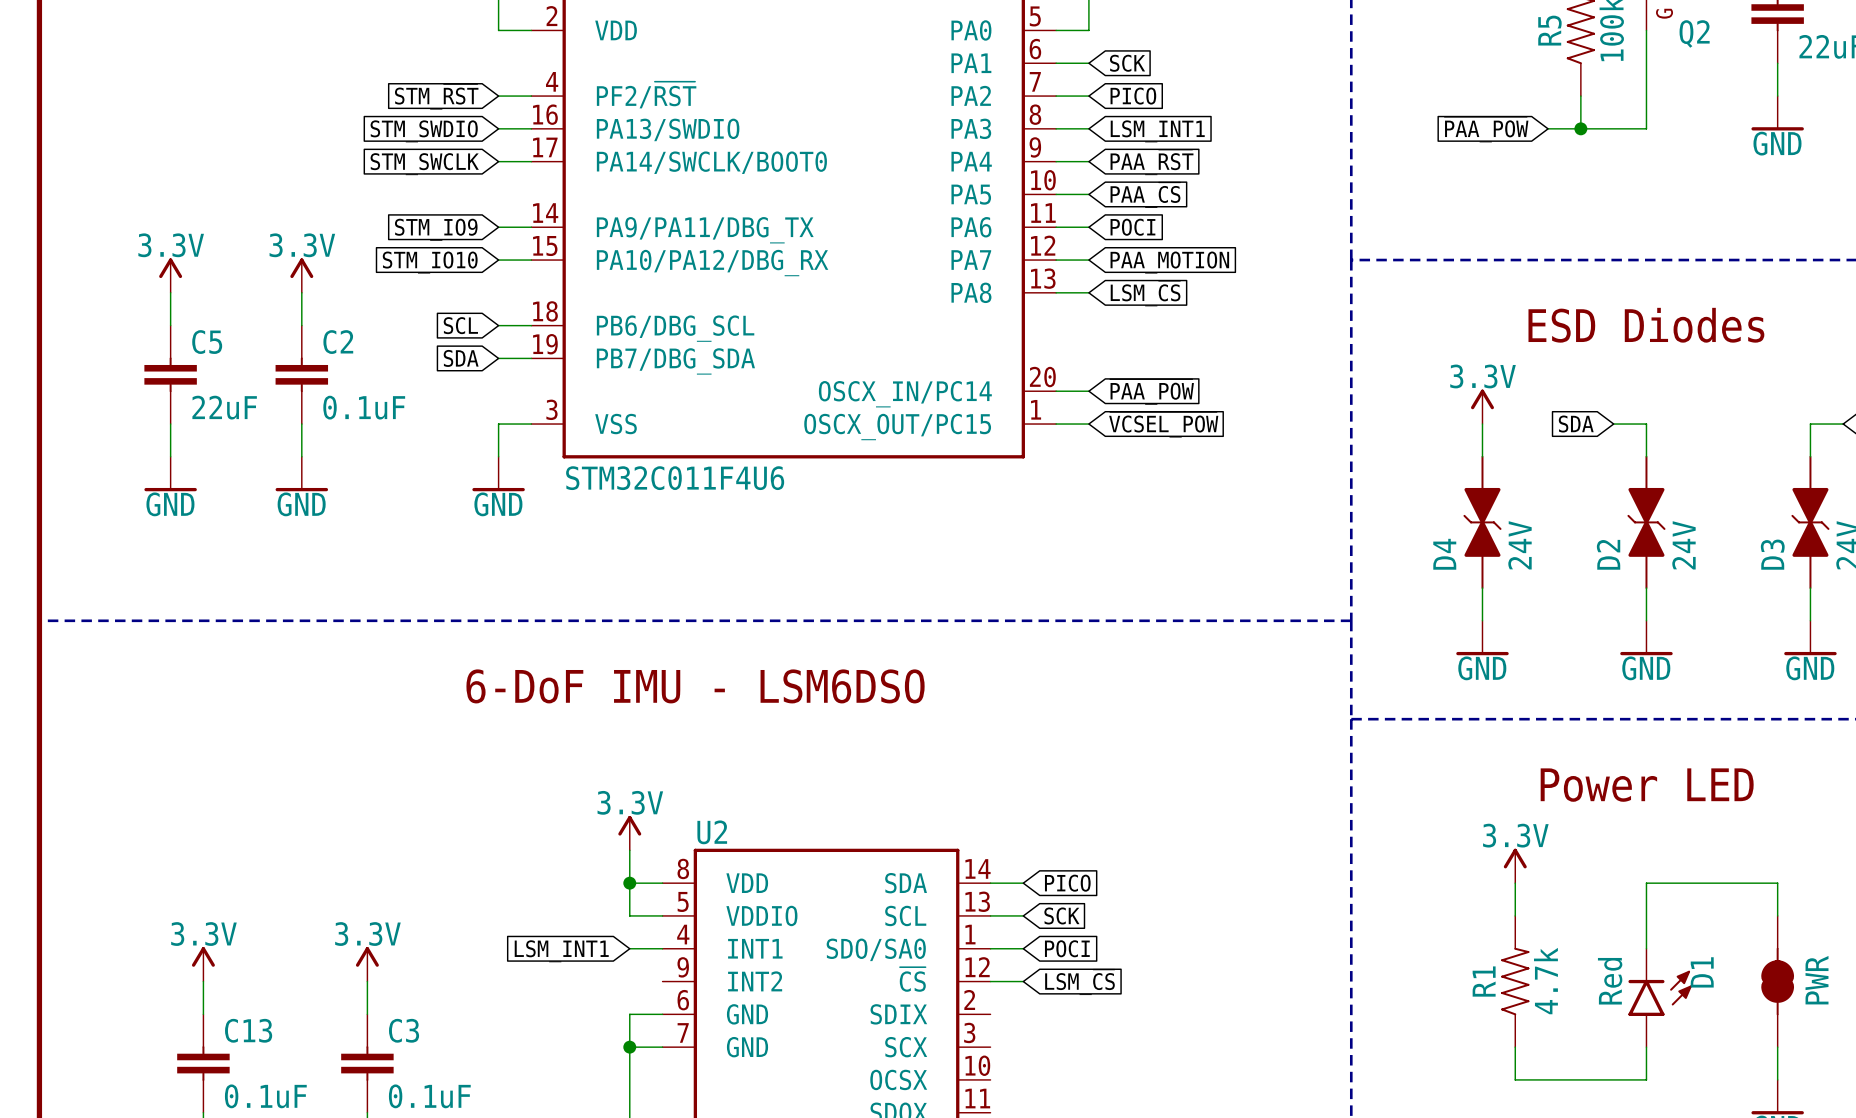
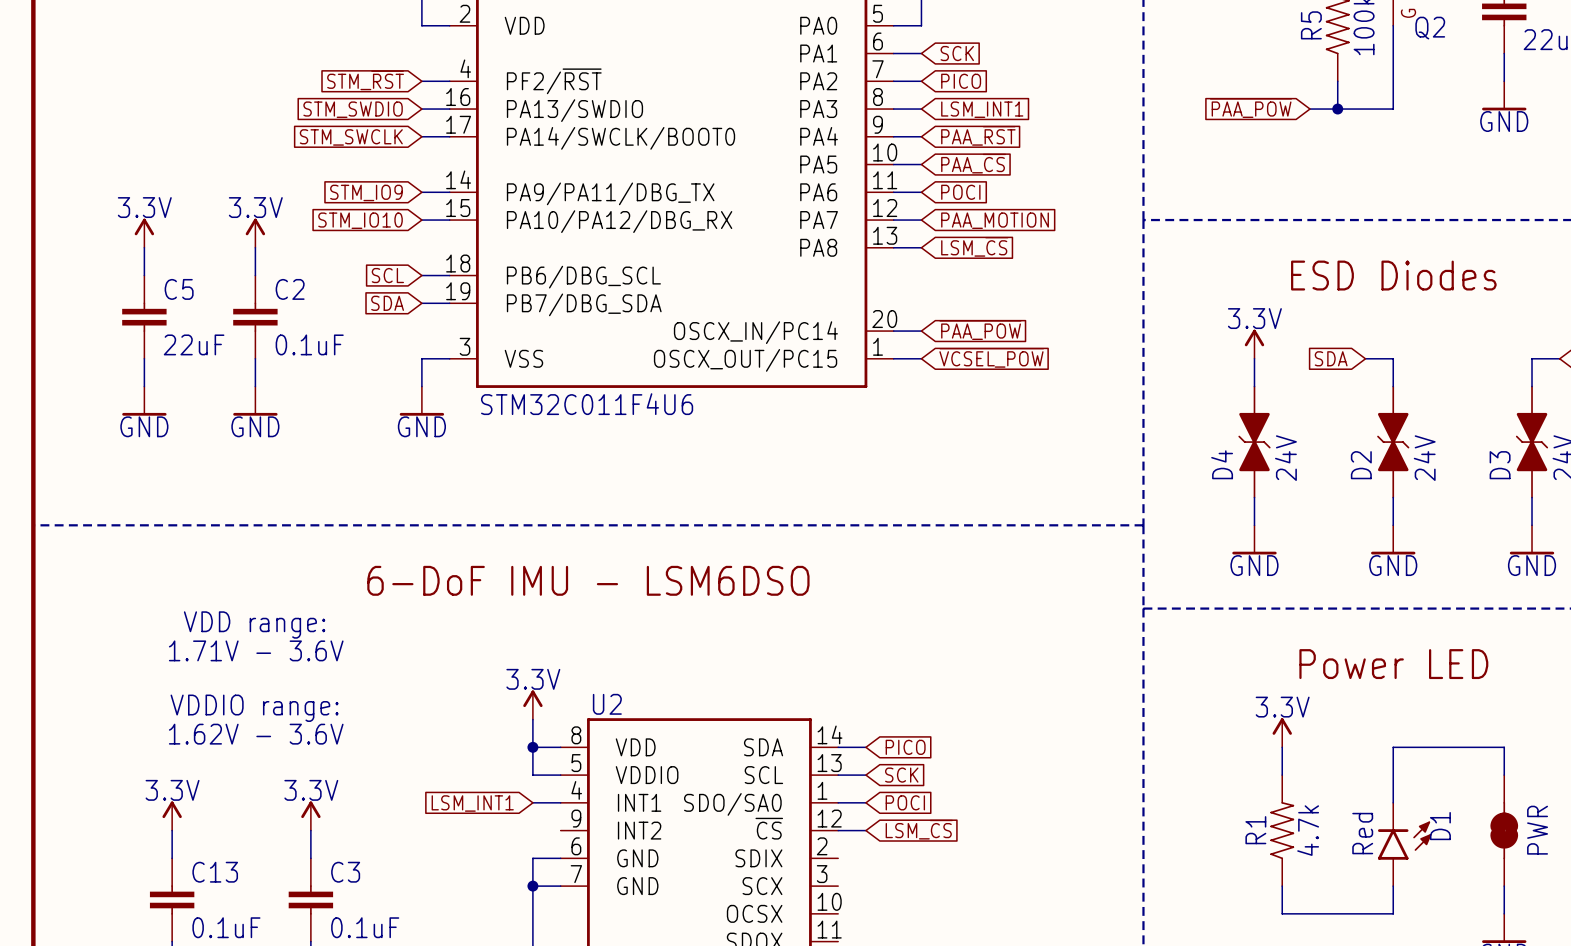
text: none -> VDD range: (254, 624)
text: none -> 1.71V - 3.6V (256, 650)
text: none -> VDDIO range: (254, 708)
text: none -> 1.62V - 3.6V (256, 734)

